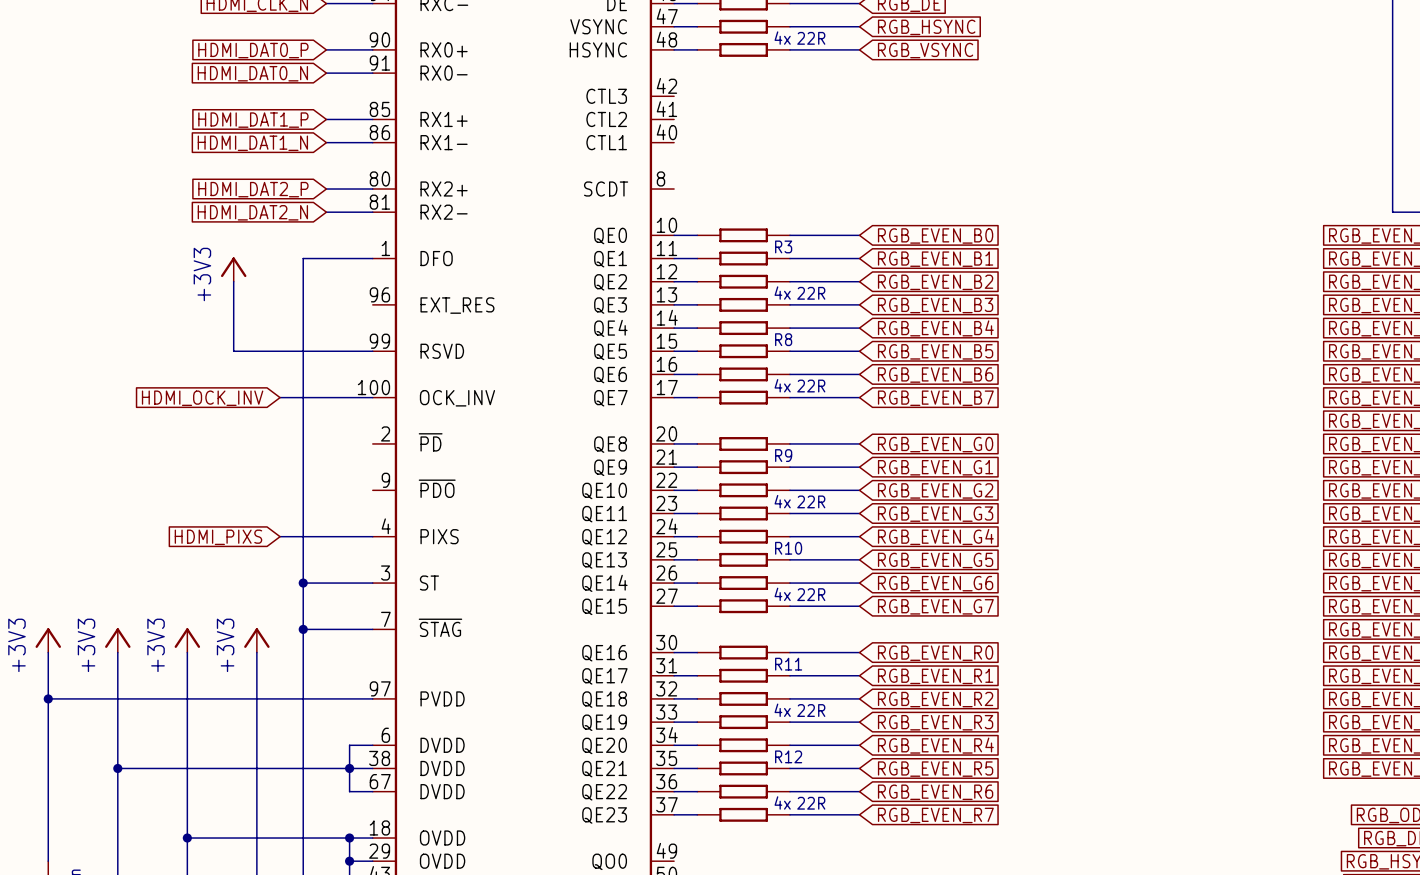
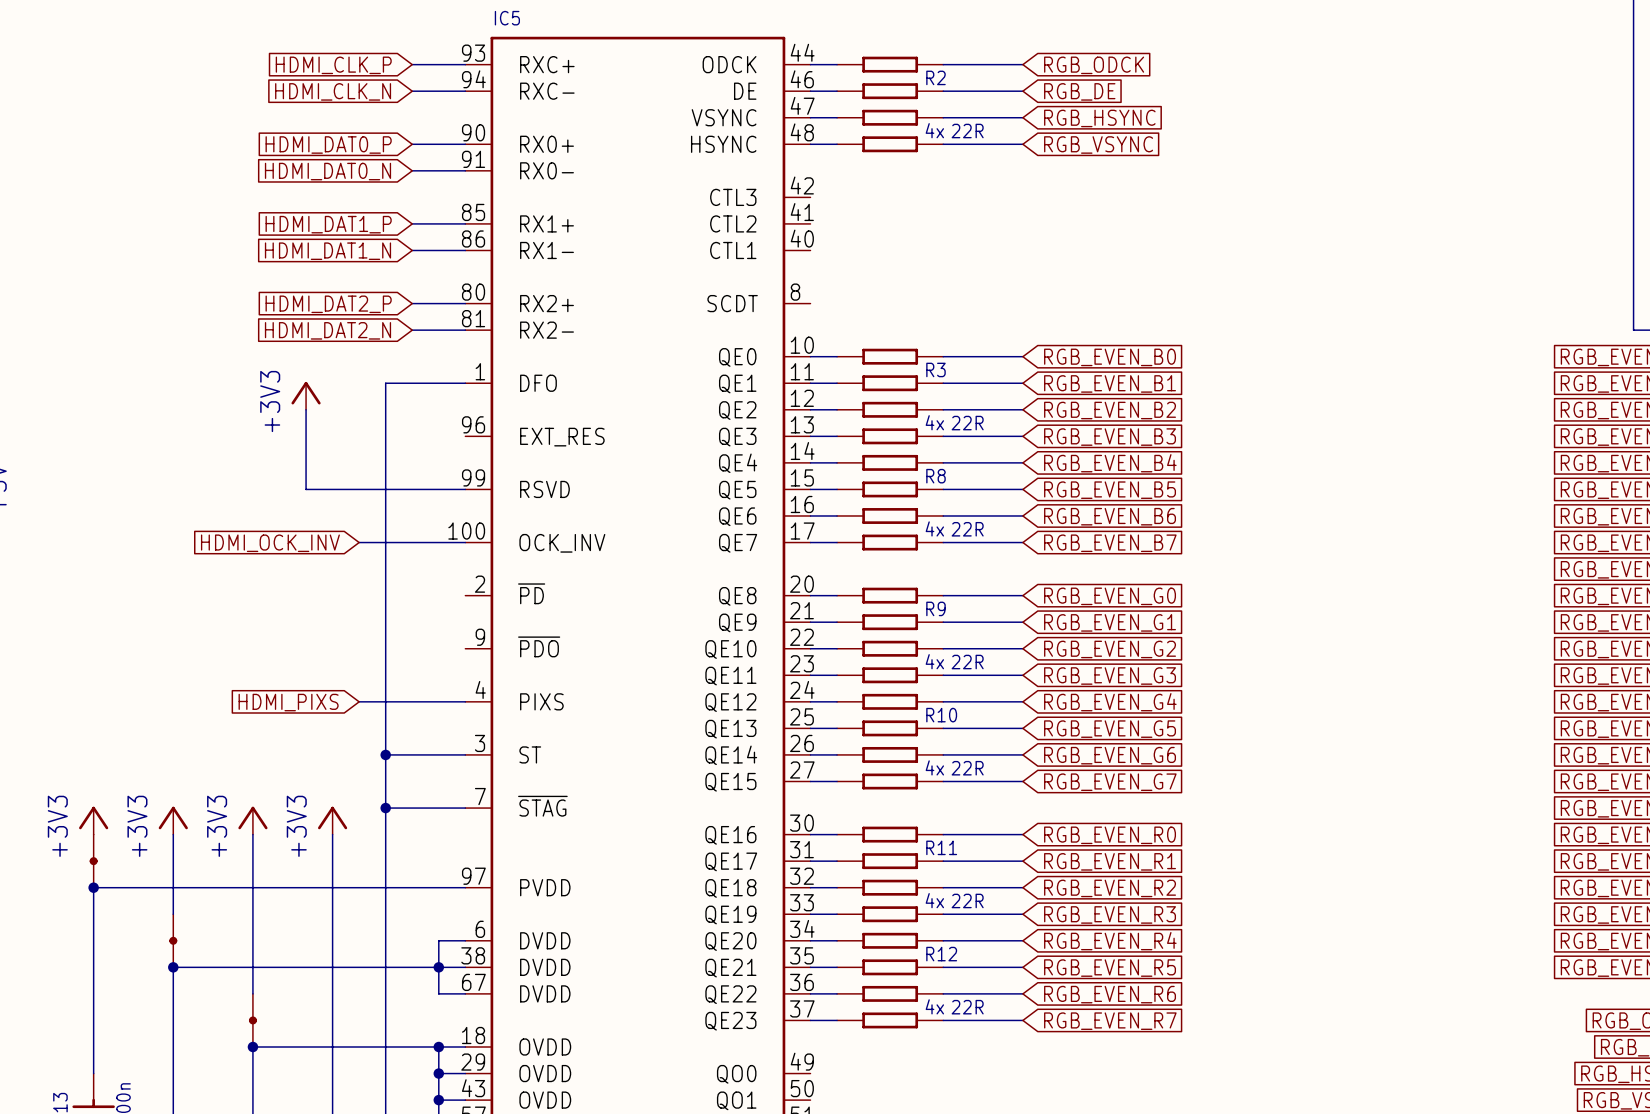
part: none -> (93, 861)
part: none -> (173, 940)
part: none -> (252, 1020)

